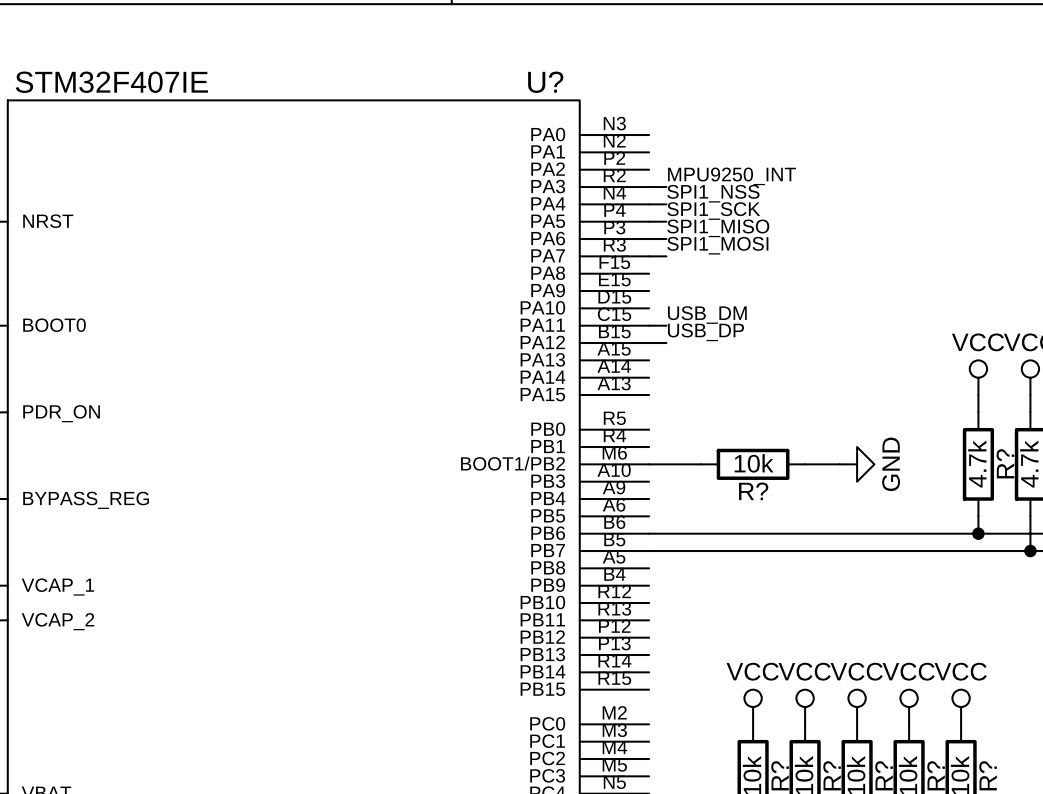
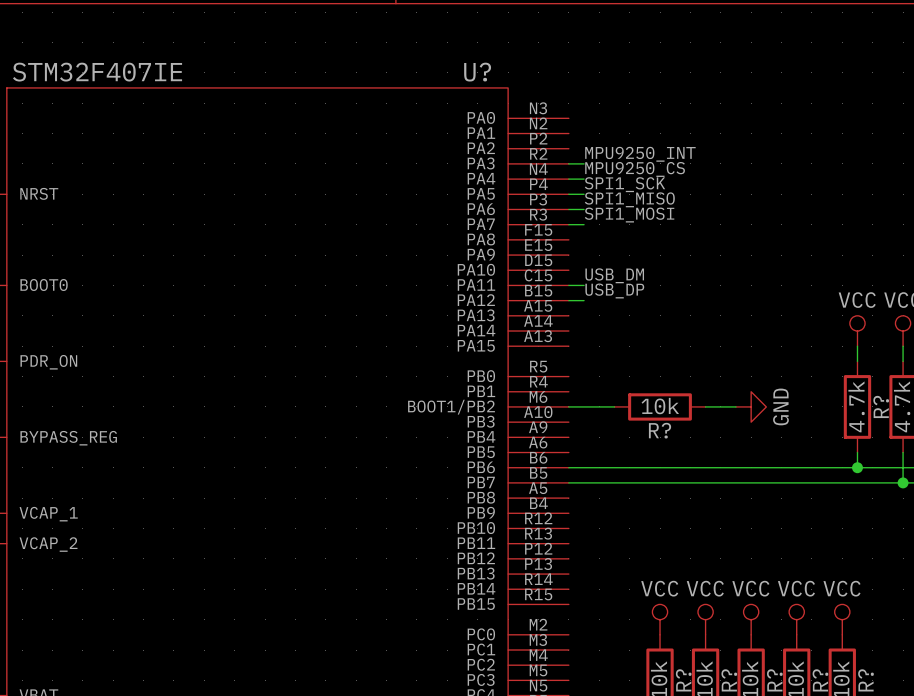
label: SPI1_NSS (713, 193) -> MPU9250_CS (635, 169)

